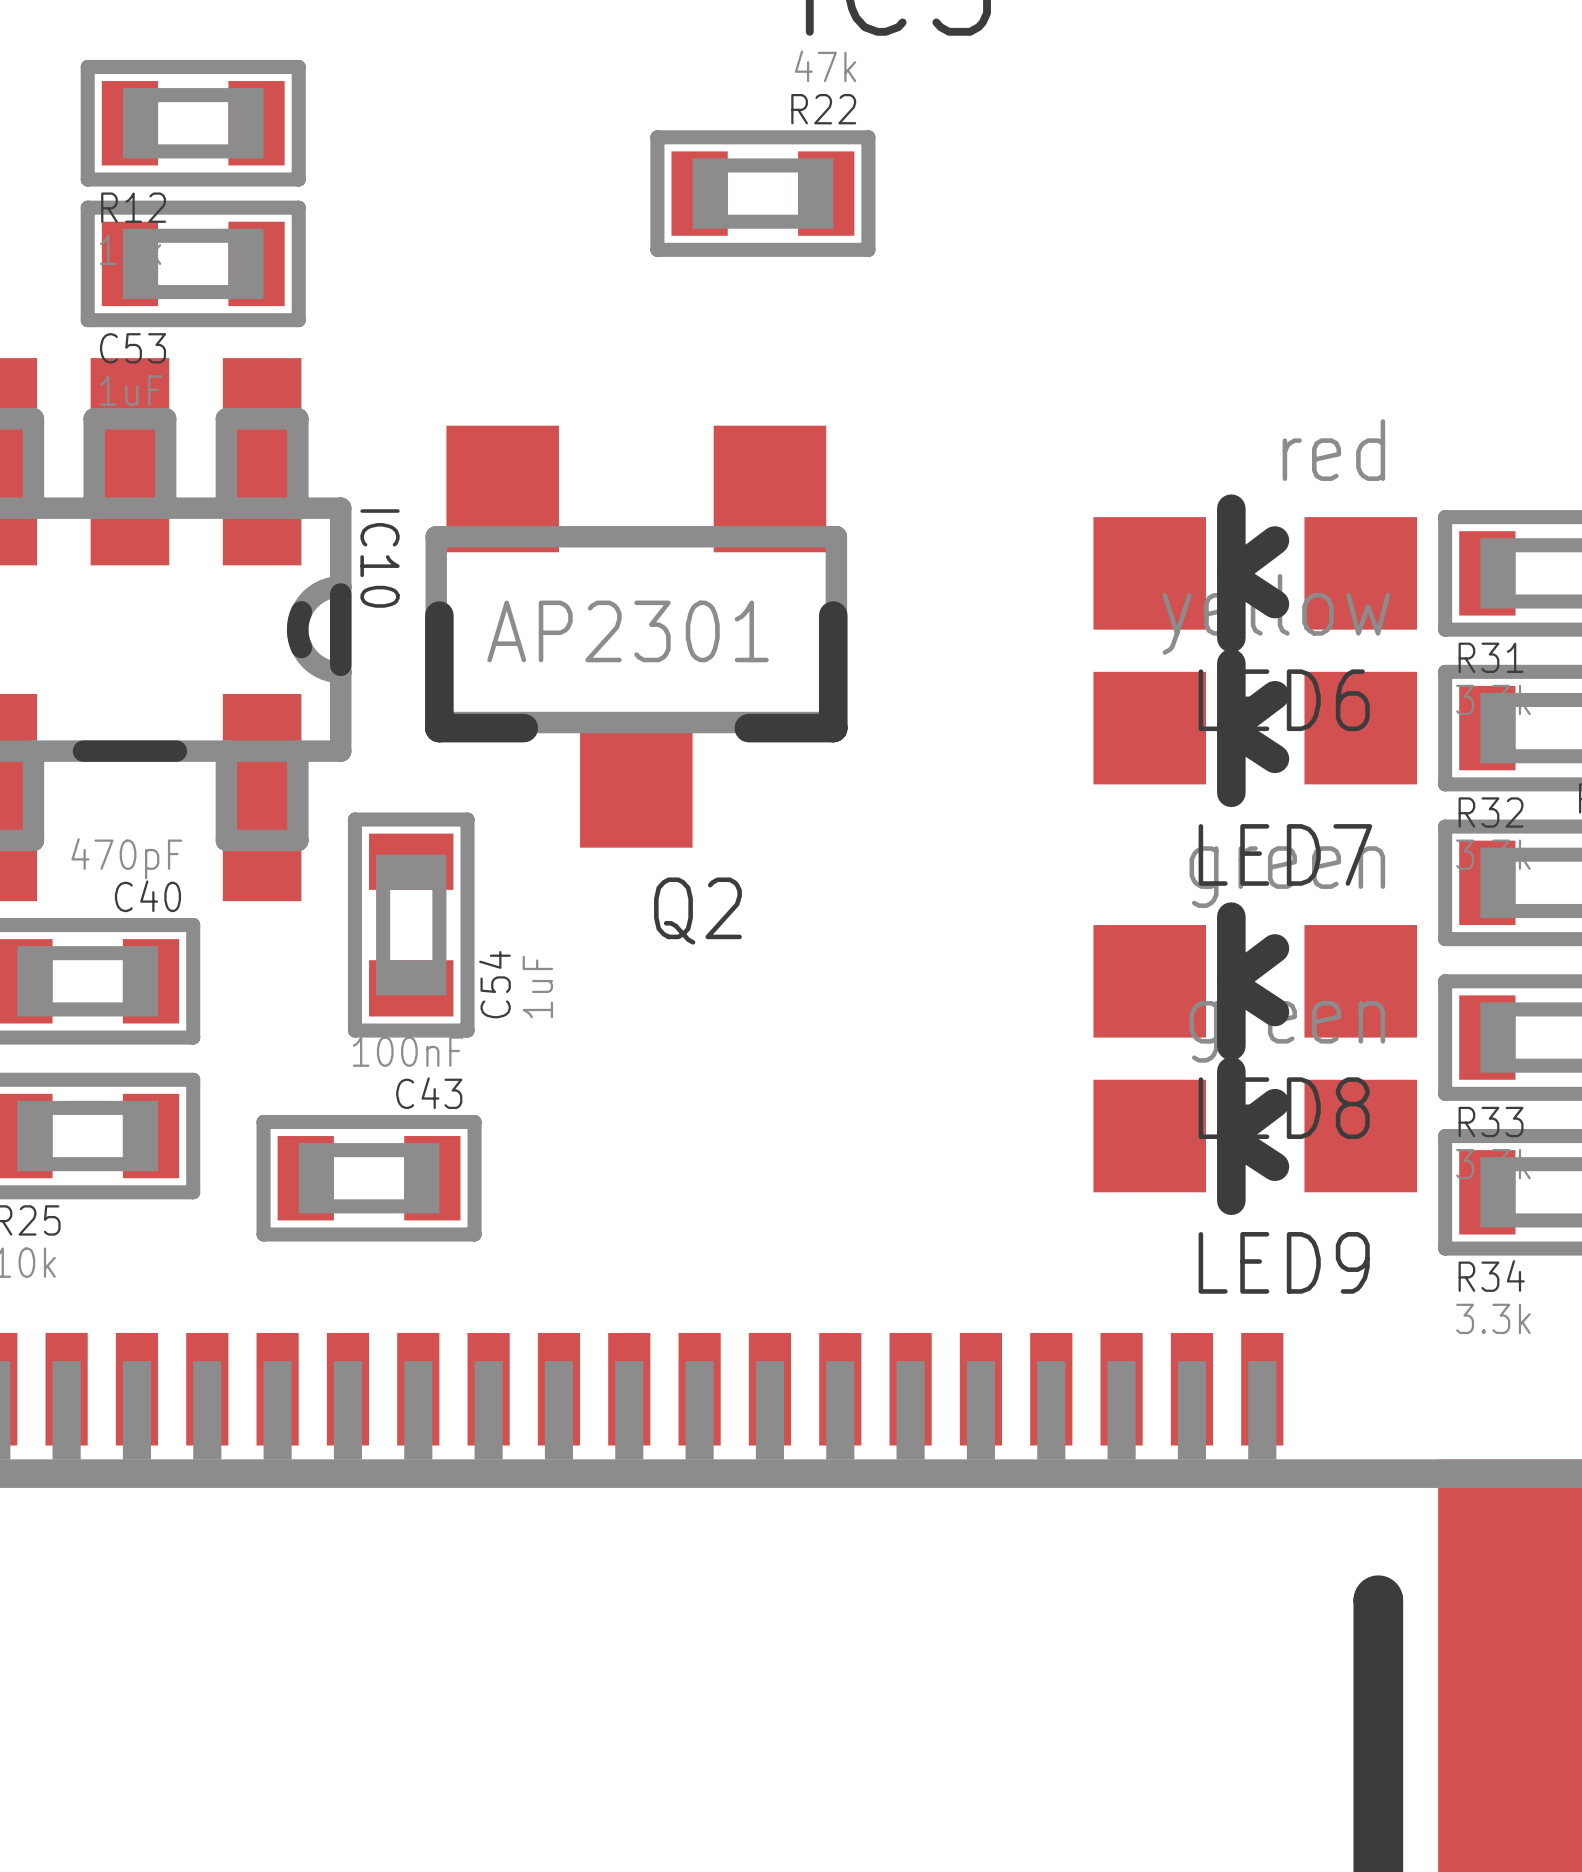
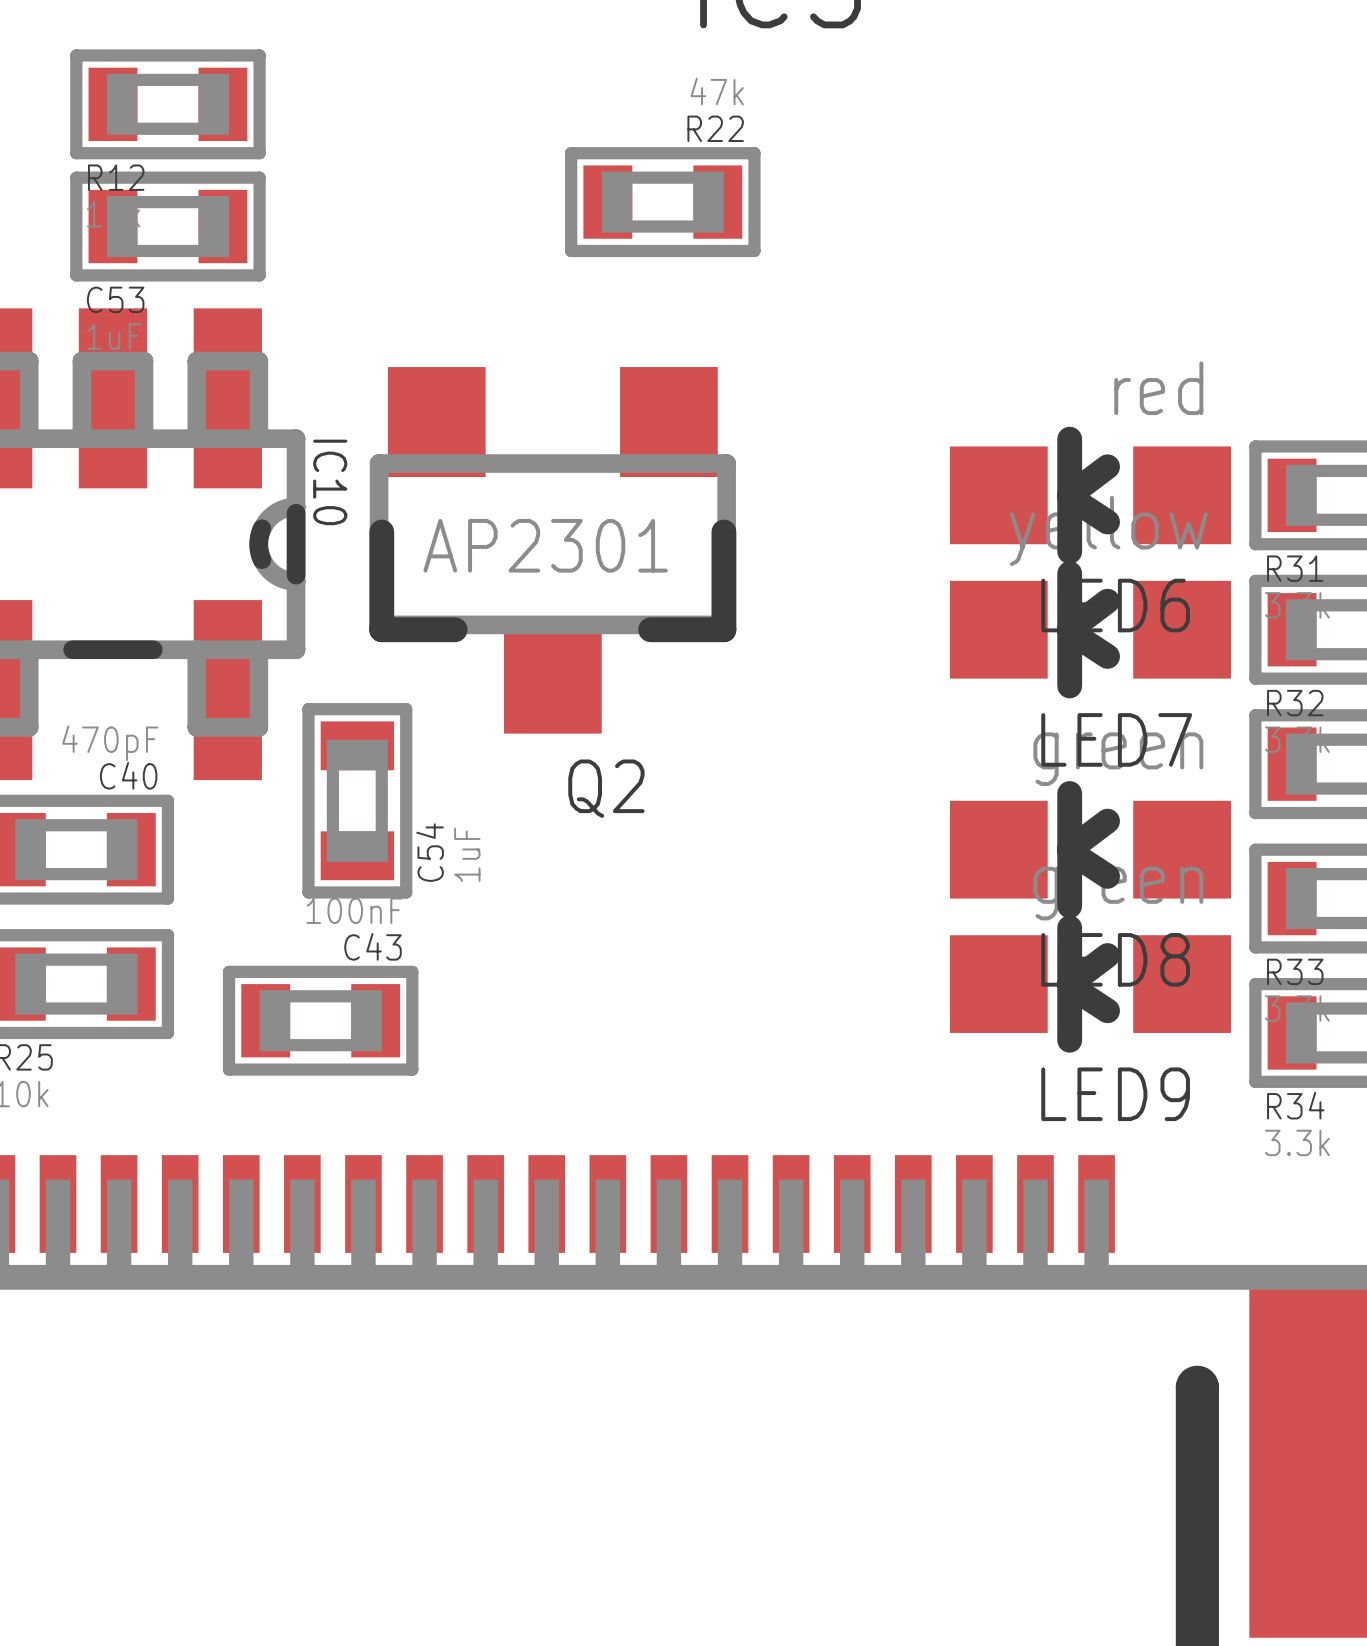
R22 position: (762, 193) -> (662, 202)

